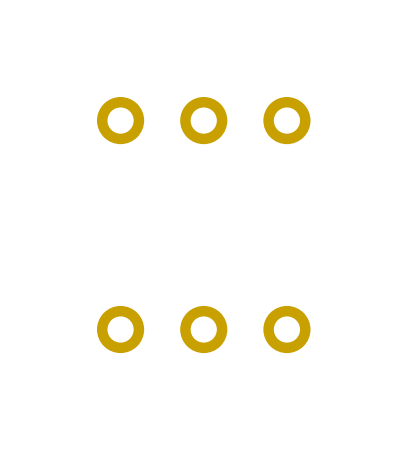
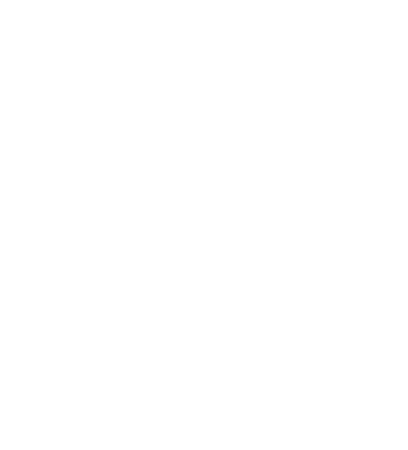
part: (203, 120) -> none
part: (203, 329) -> none

